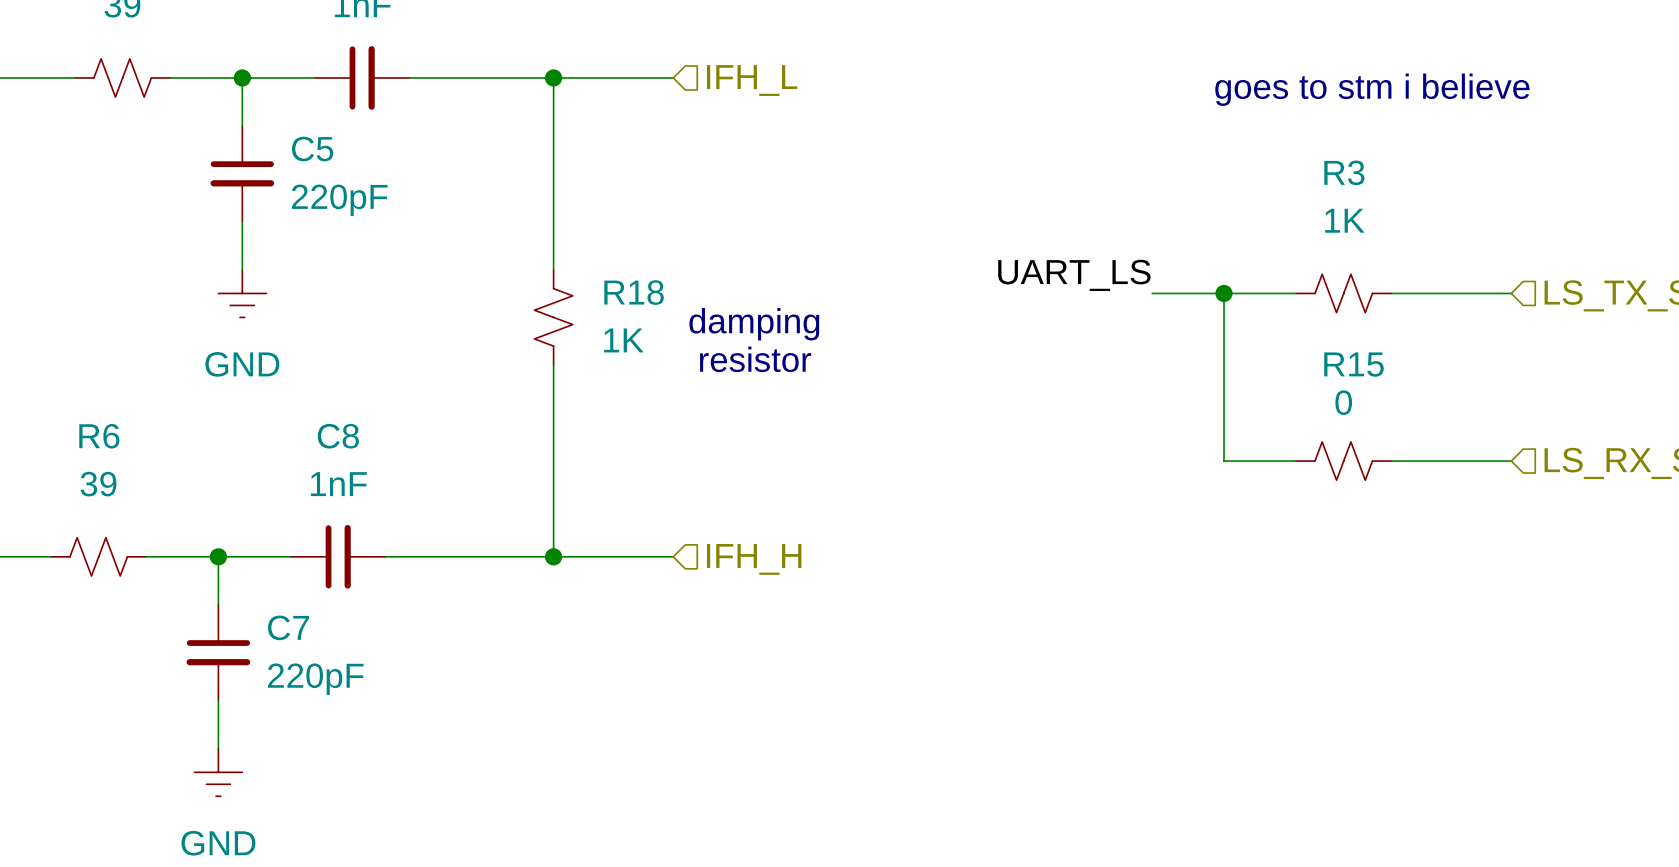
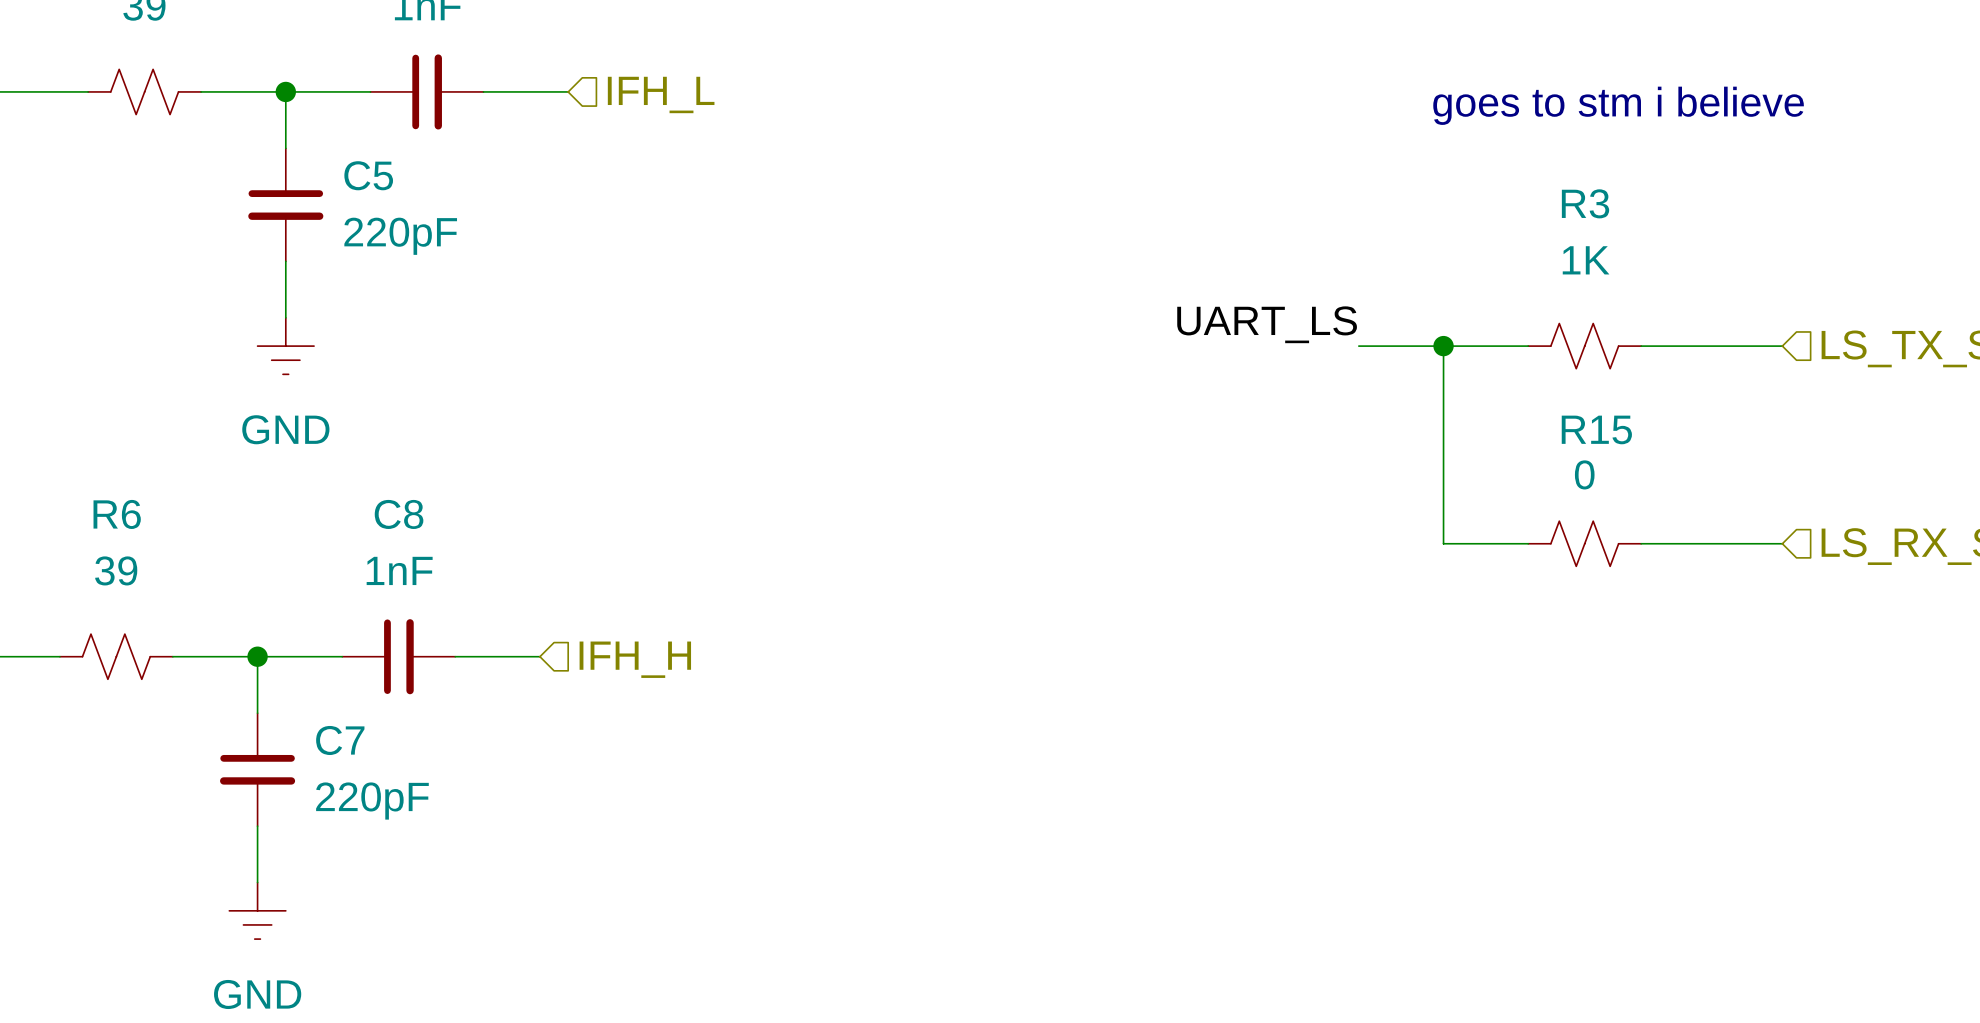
wire: (481, 77) (673, 77) -> none
wire: (553, 77) (553, 269) -> none
junction: (553, 77) -> none
hierarchical label position: IFH_L (752, 80) -> IFH_L (661, 94)
R18: 1K (553, 317) -> none
text: damping (754, 324) -> none
text: resistor (755, 359) -> none
wire: (553, 365) (553, 556) -> none
wire: (457, 556) (673, 556) -> none
junction: (553, 556) -> none
hierarchical label position: IFH_H (754, 559) -> IFH_H (635, 659)

